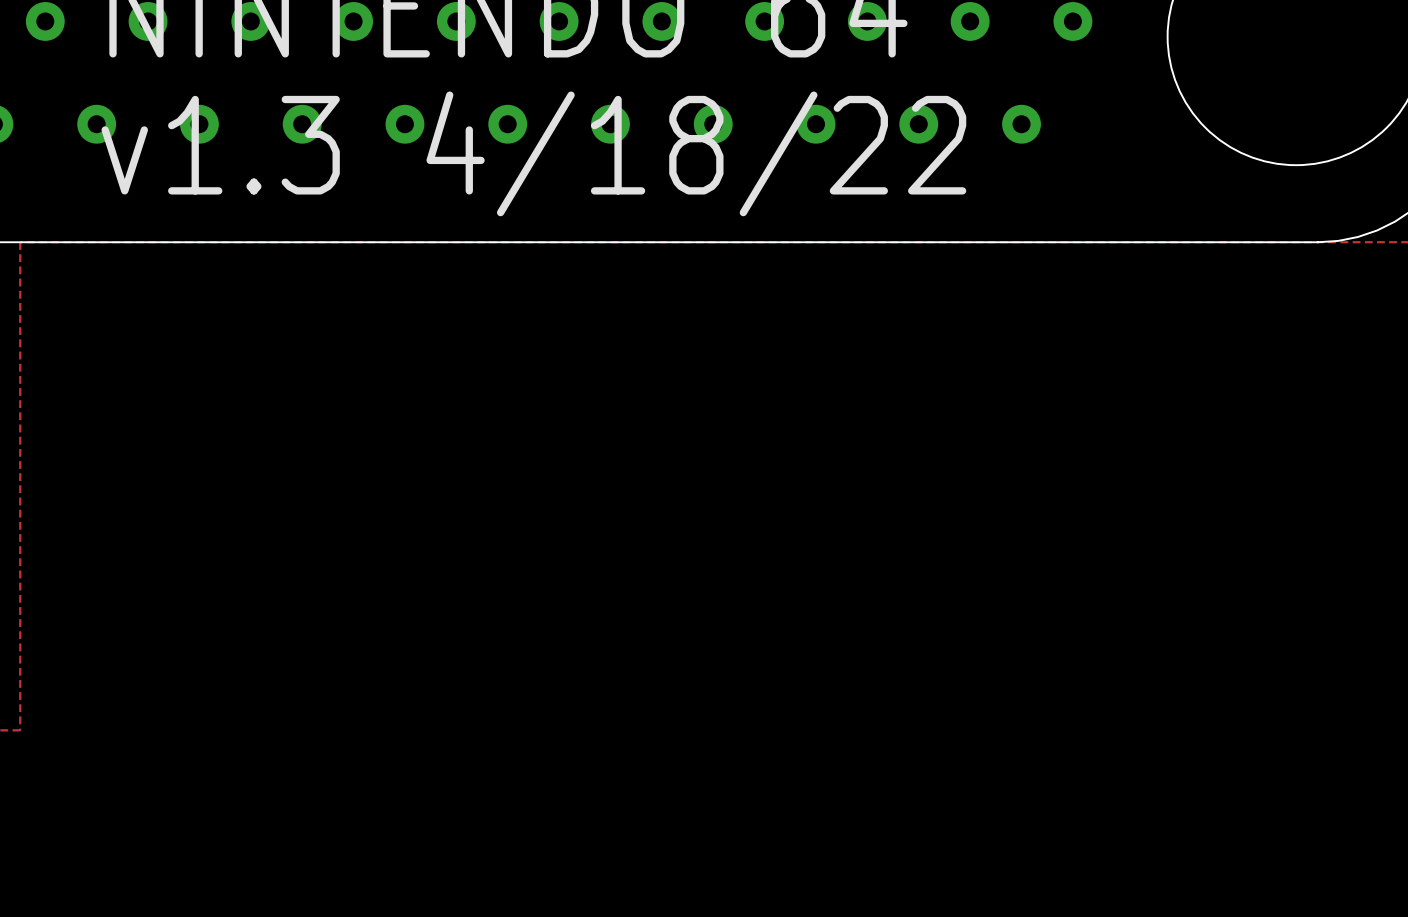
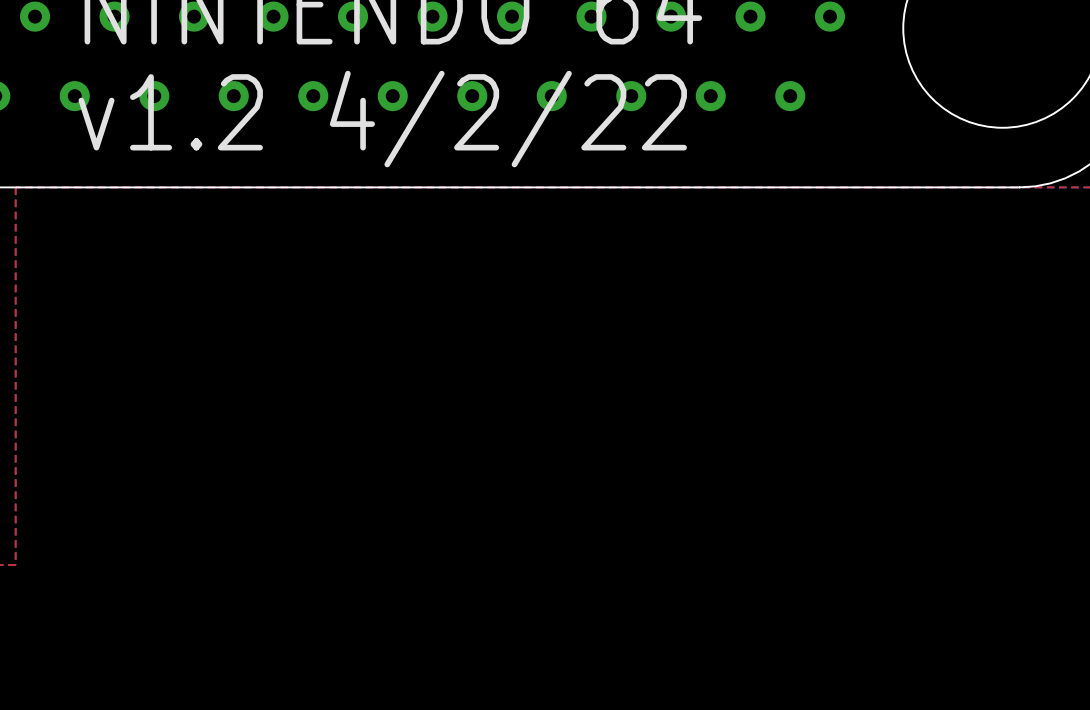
text: v1.3 4/18/22 (533, 153) -> v1.2 4/2/22 (382, 119)

